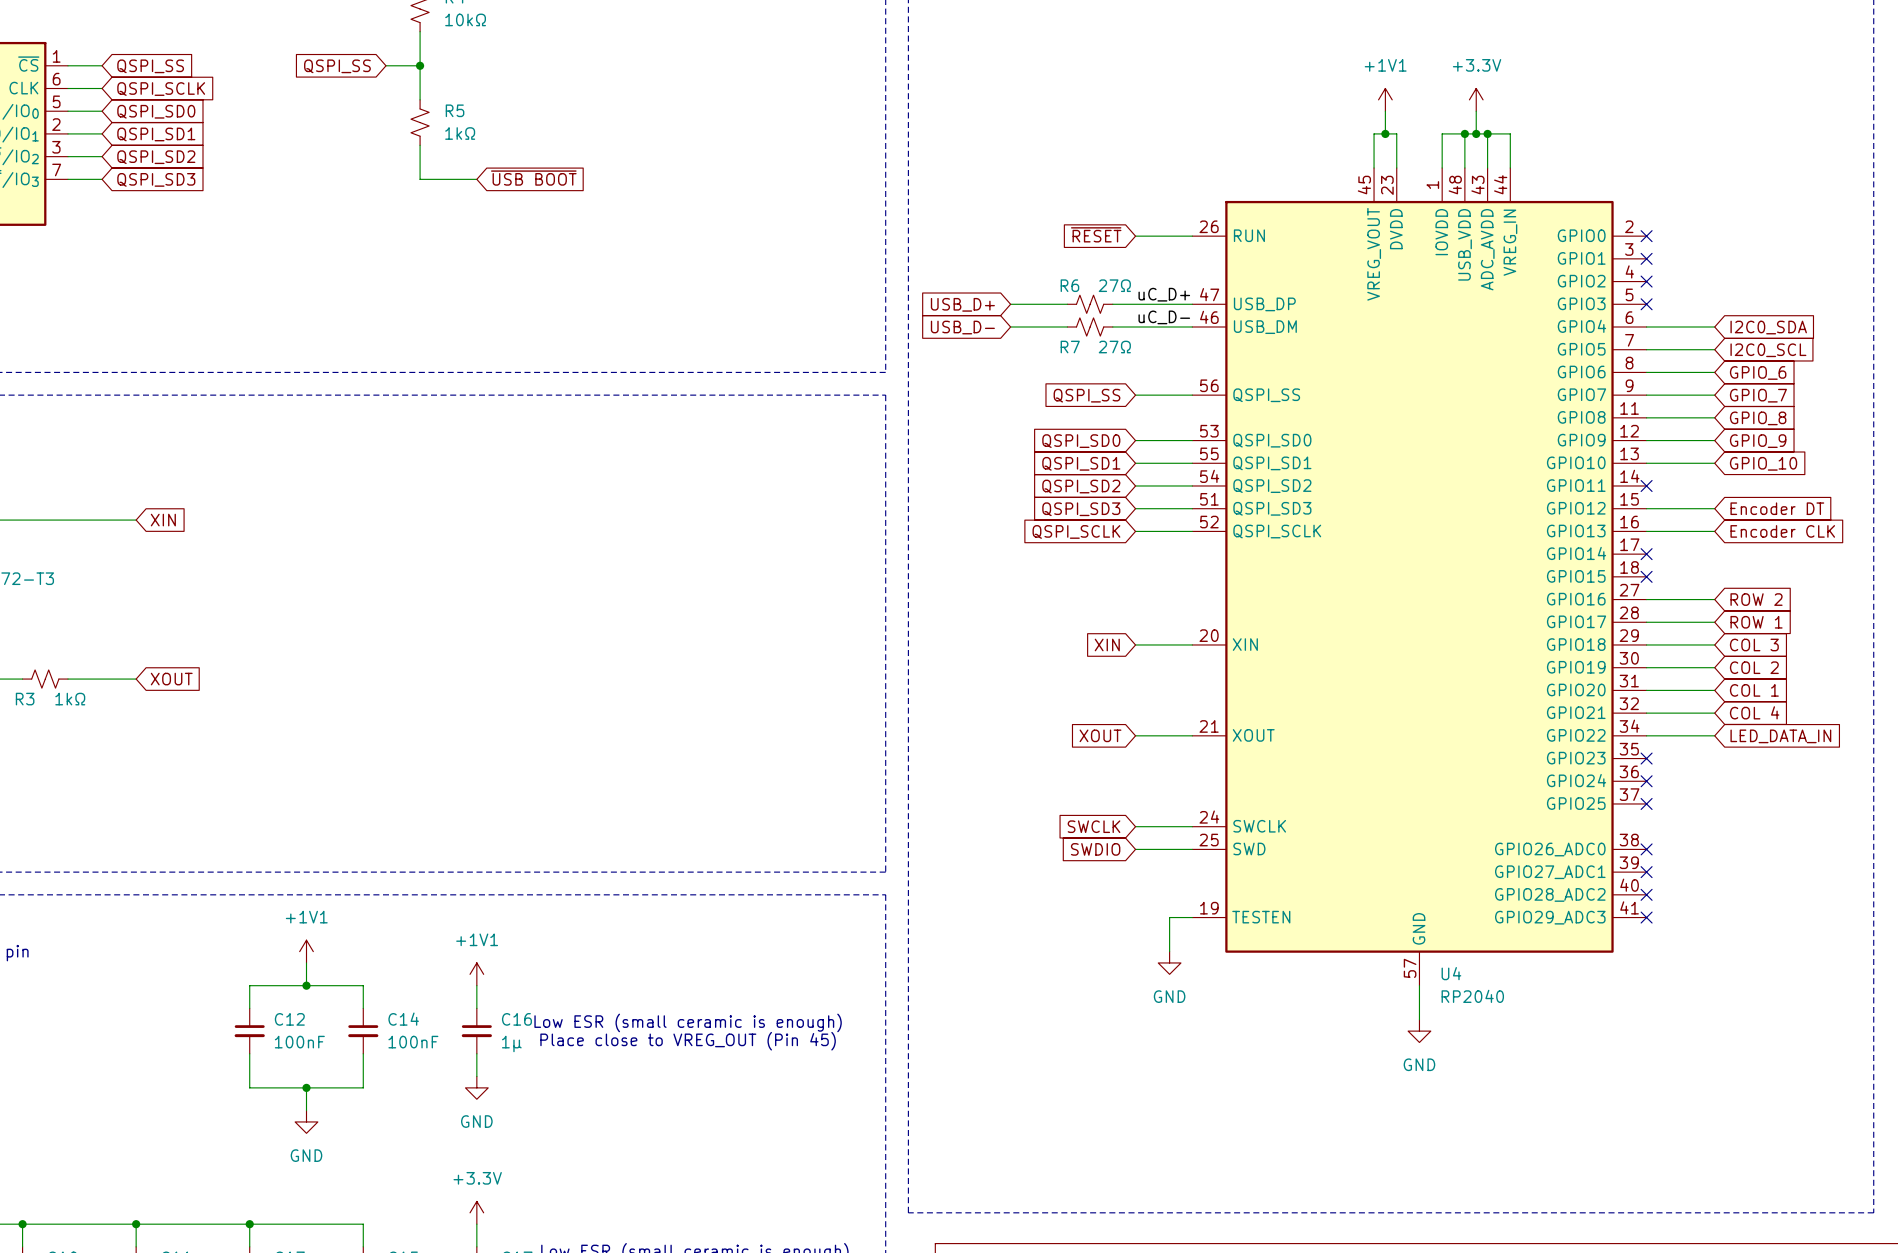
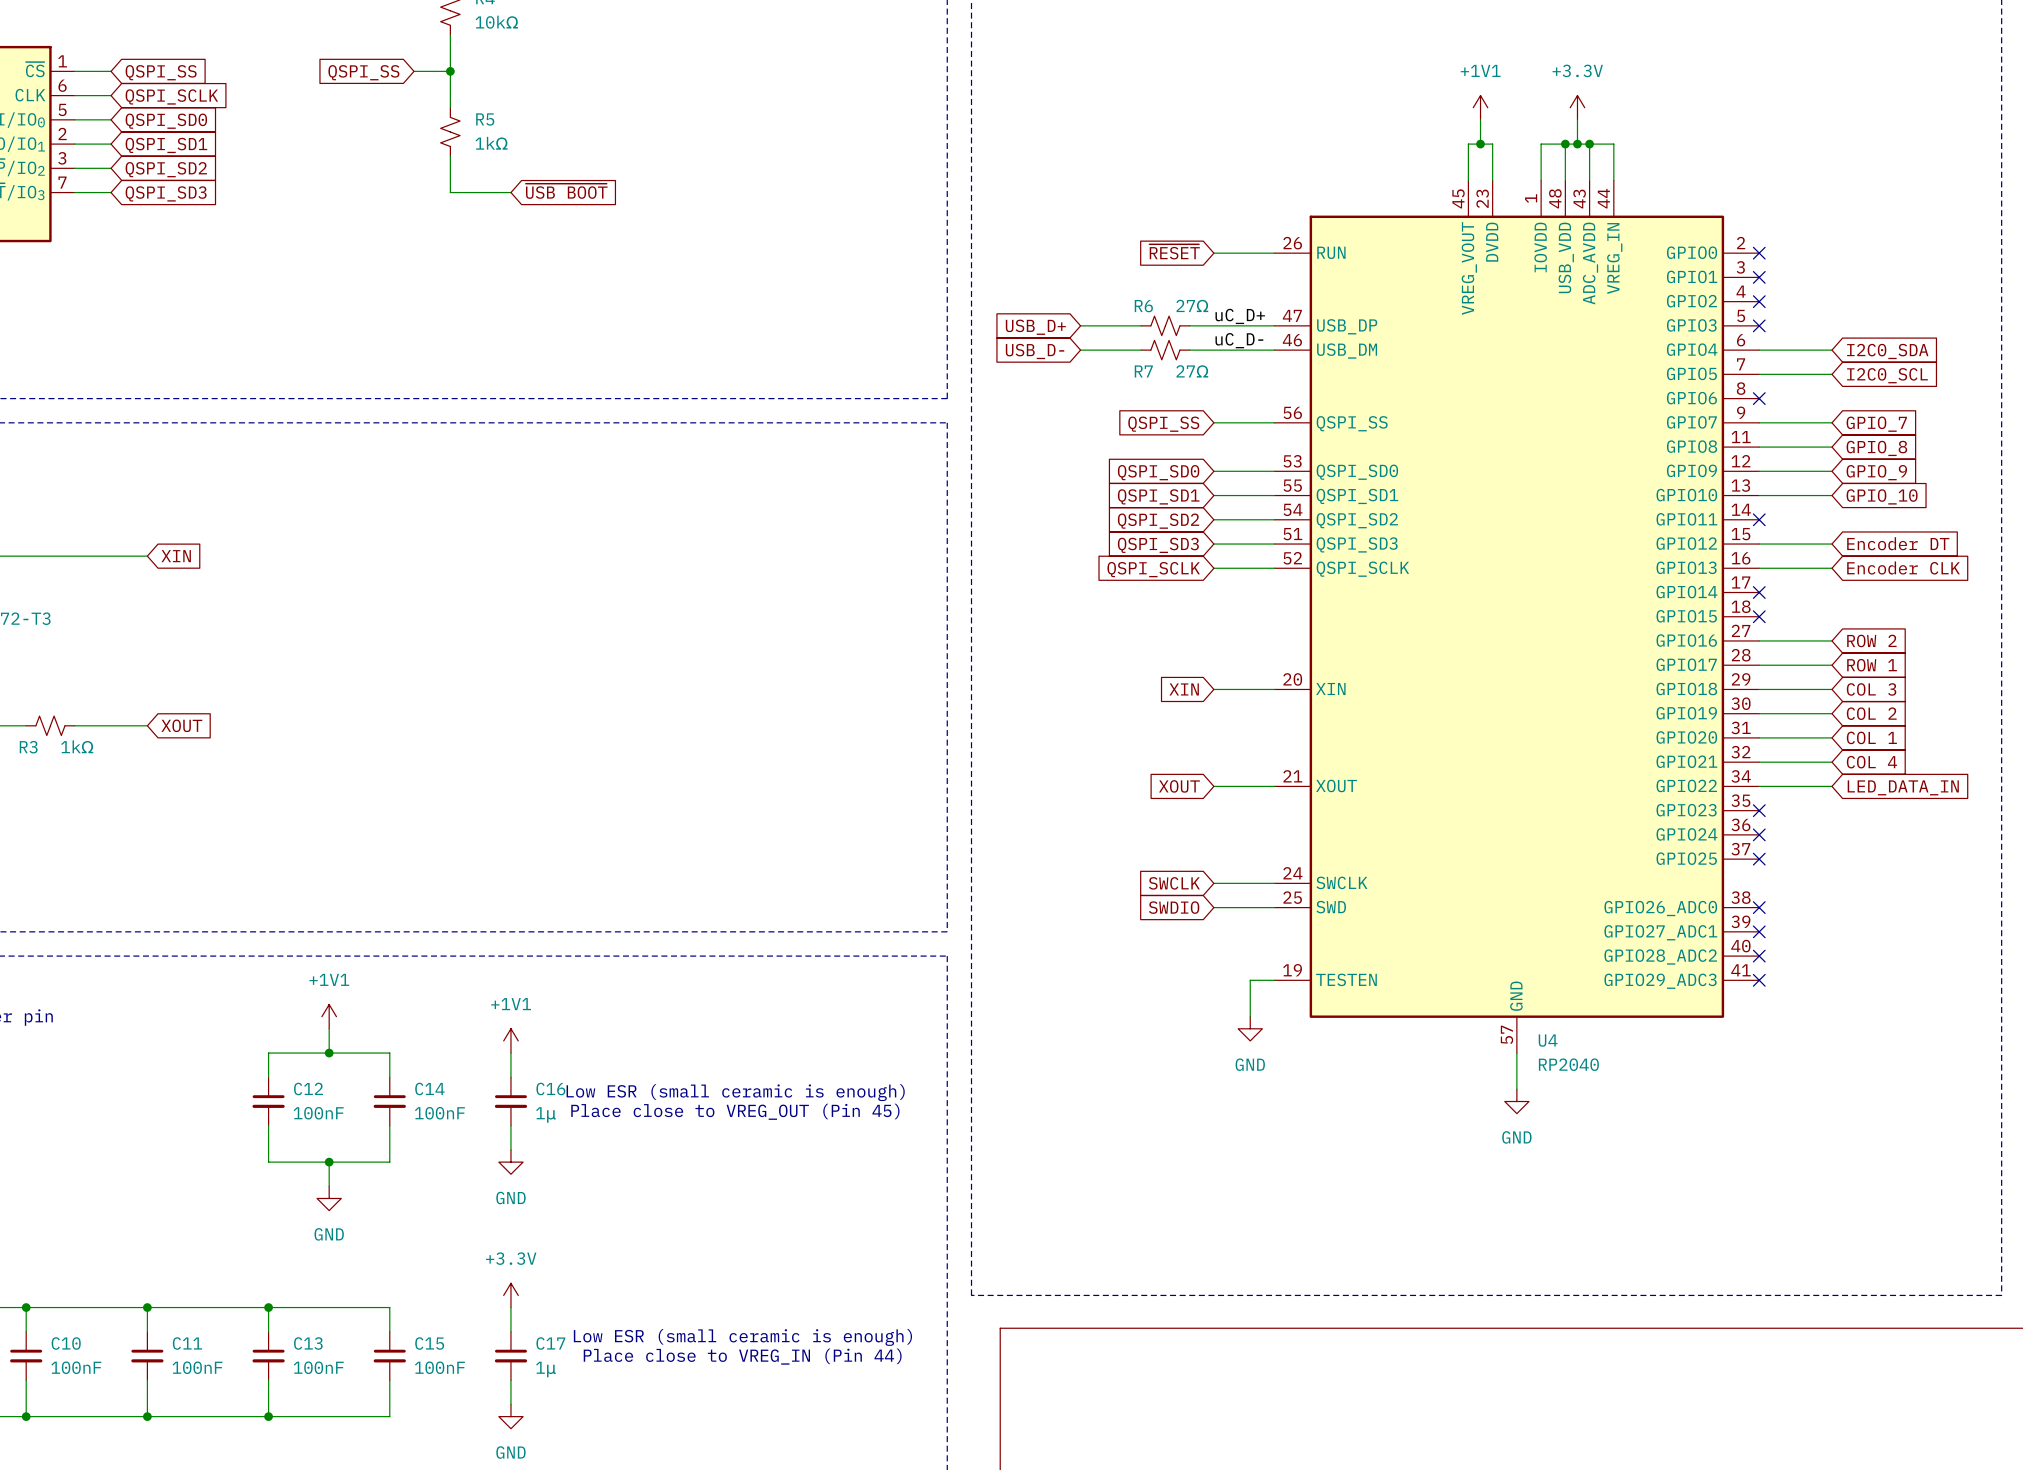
wire: (1646, 372) (1714, 372) -> none
no-connect mark: none -> (1759, 398)
global label: GPIO_6 (1758, 372) -> none

